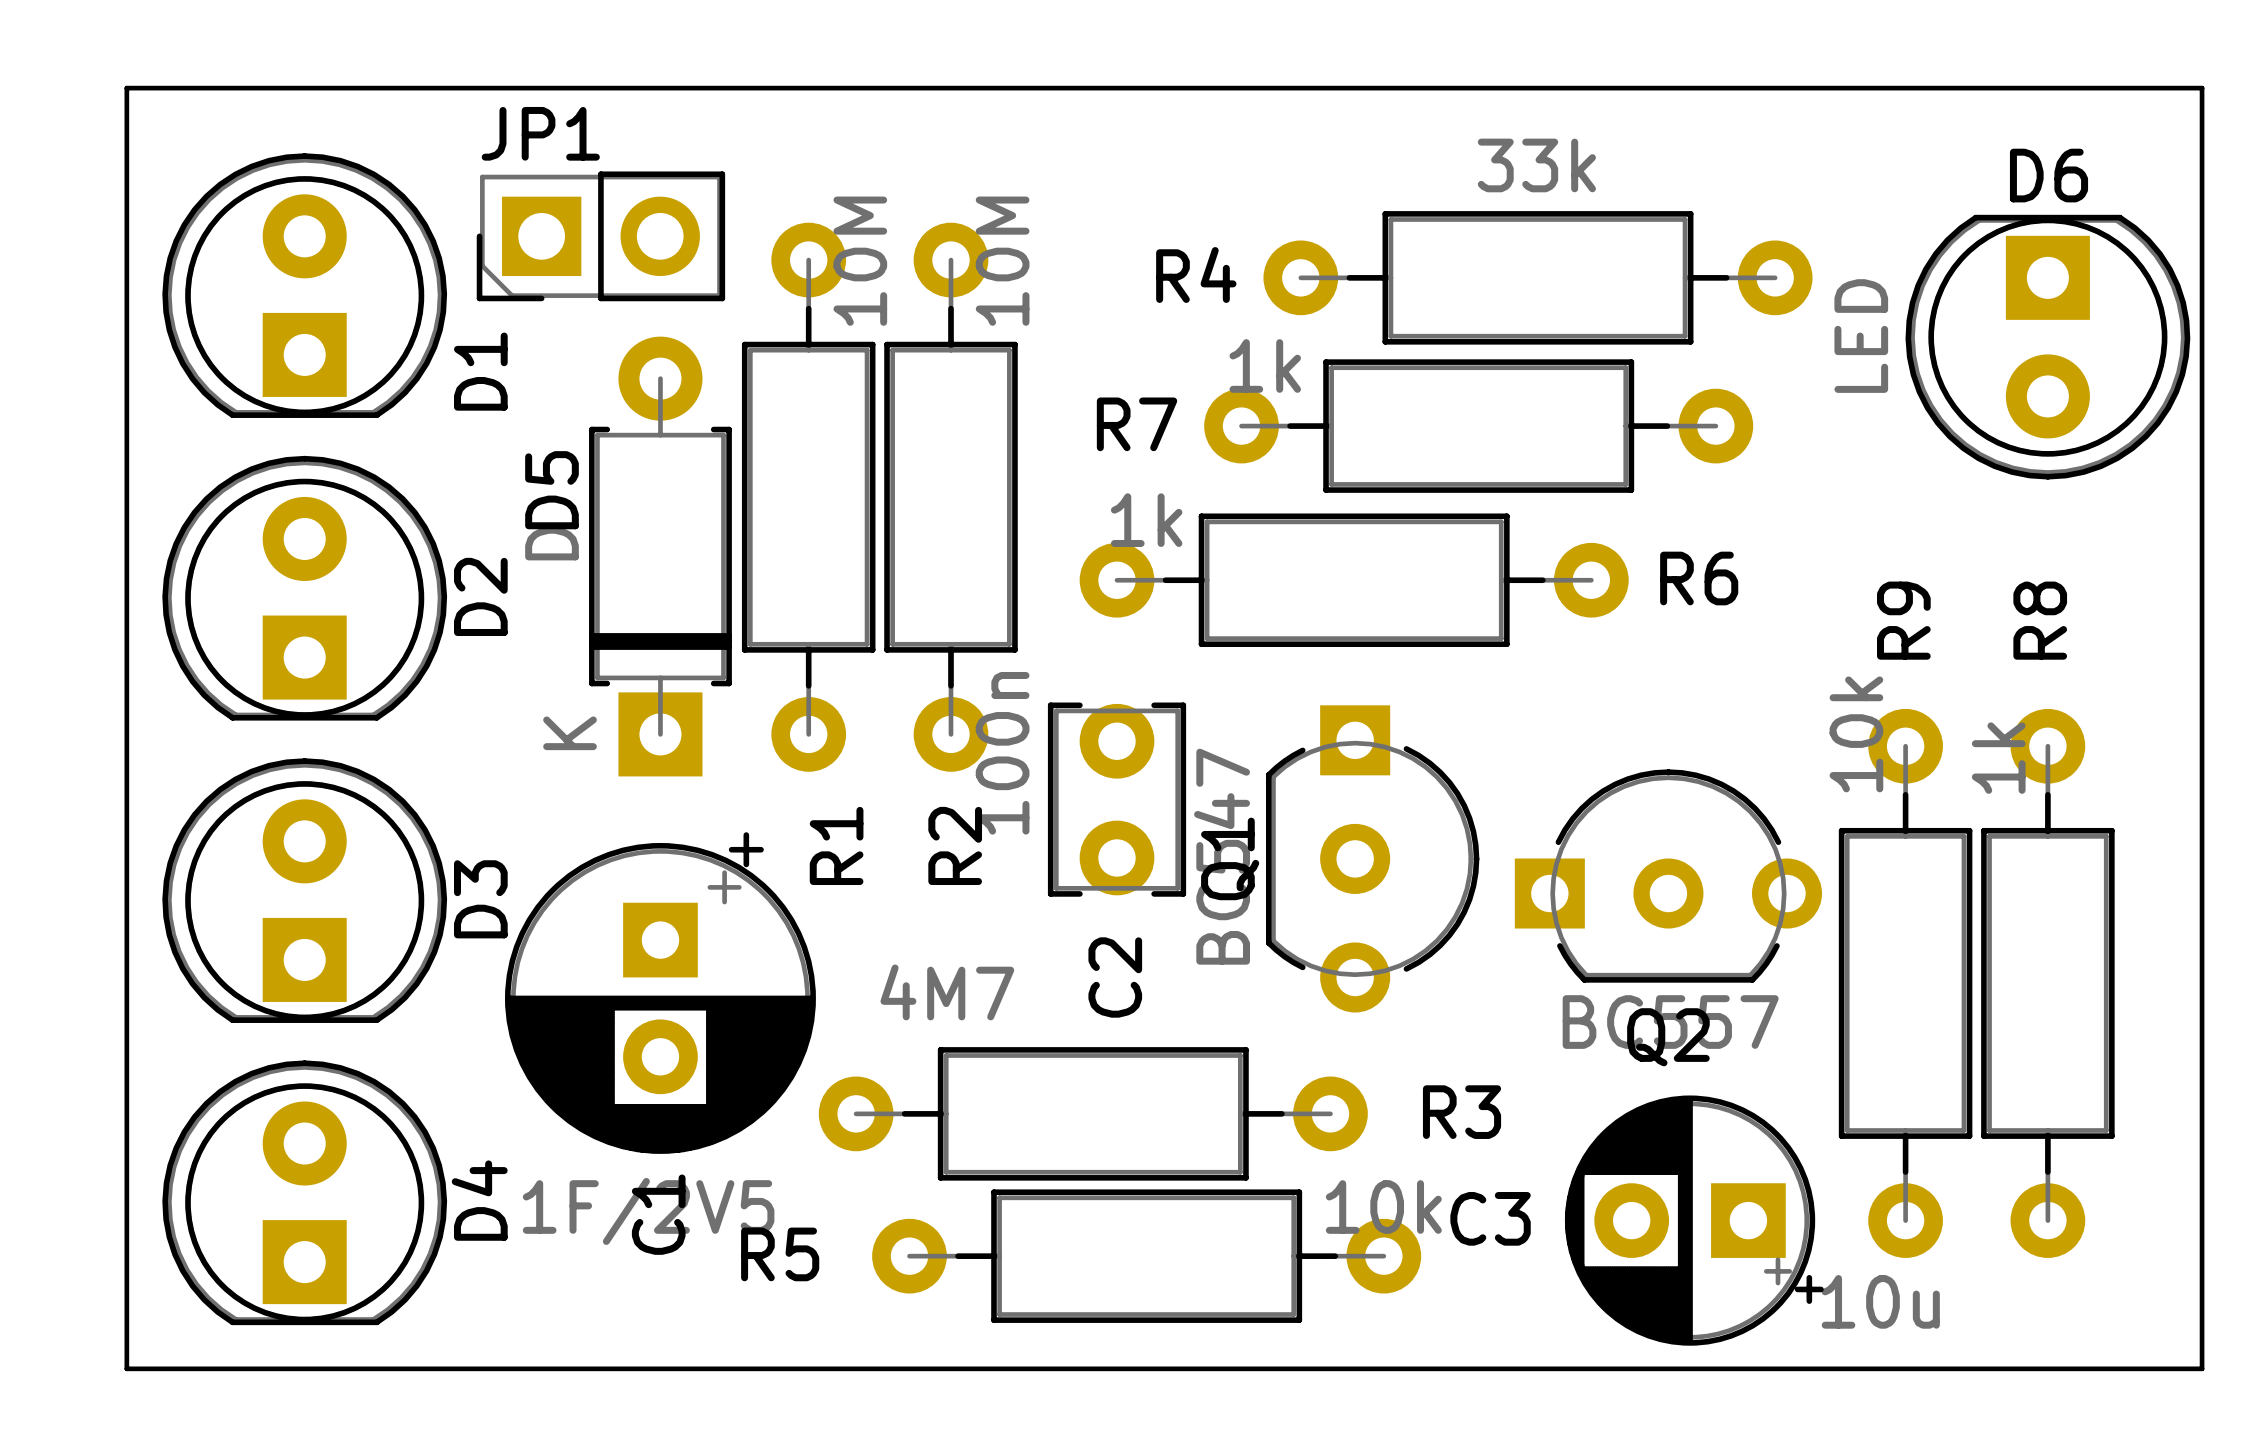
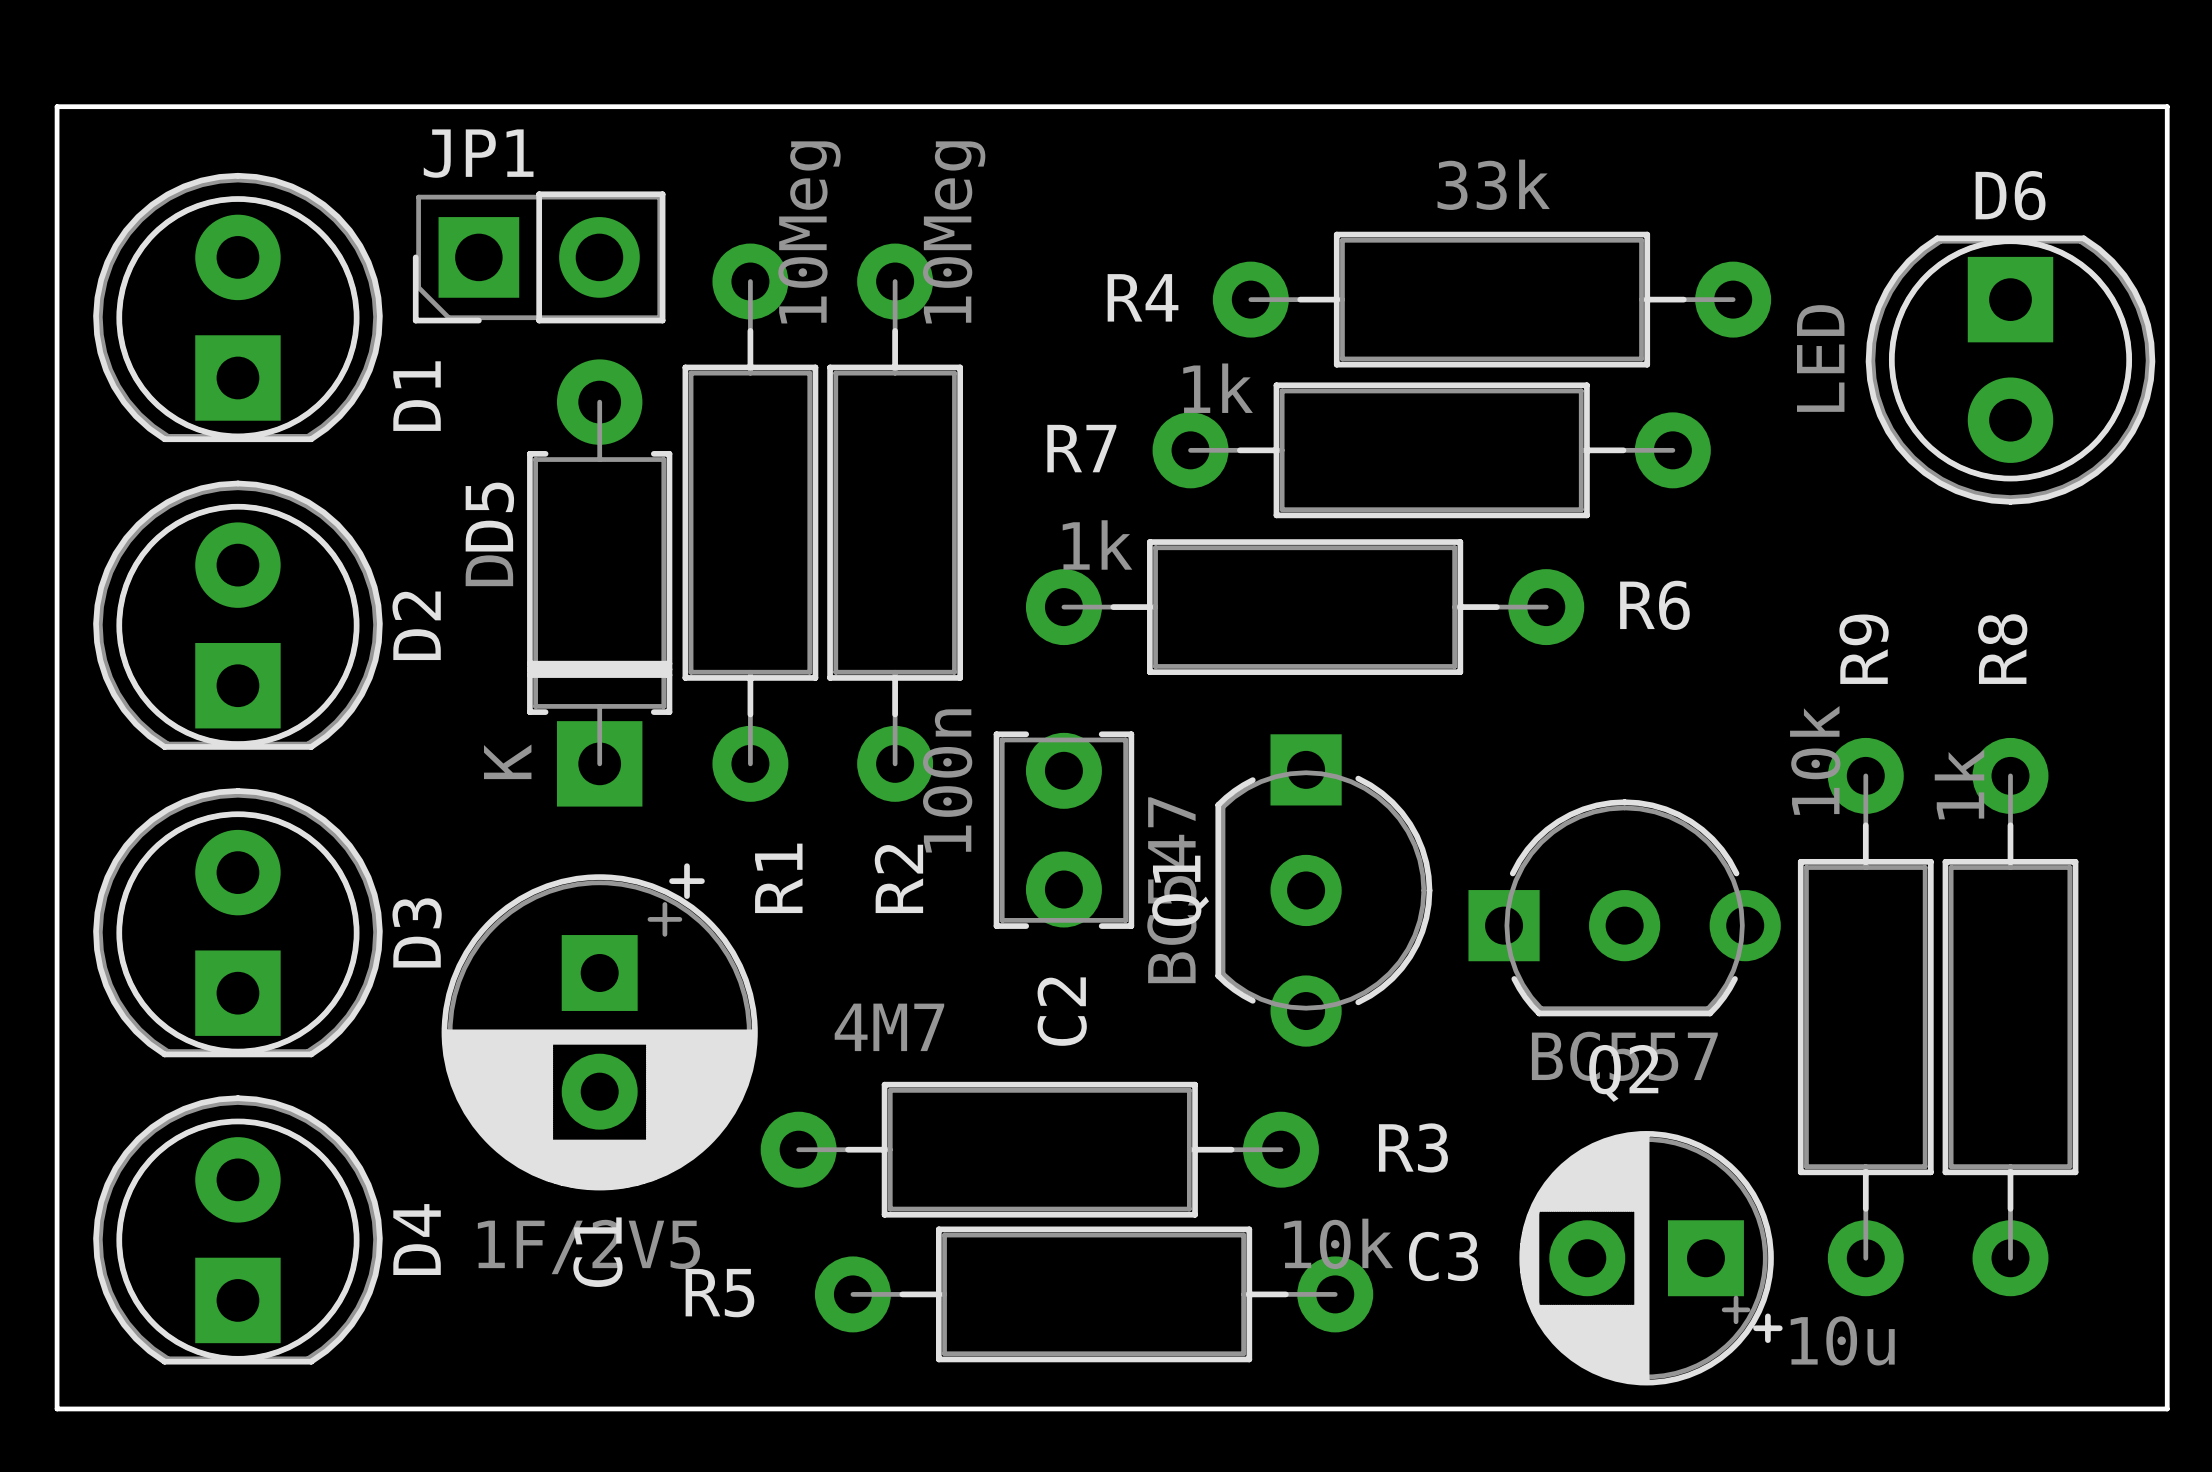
R1 value: 10M (860, 261) -> 10Meg (809, 232)
R2 value: 10M (1002, 261) -> 10Meg (954, 232)

